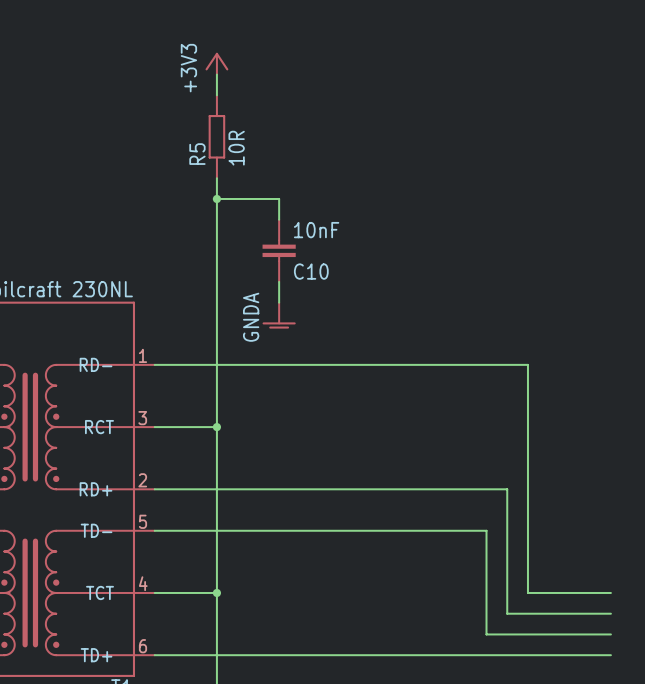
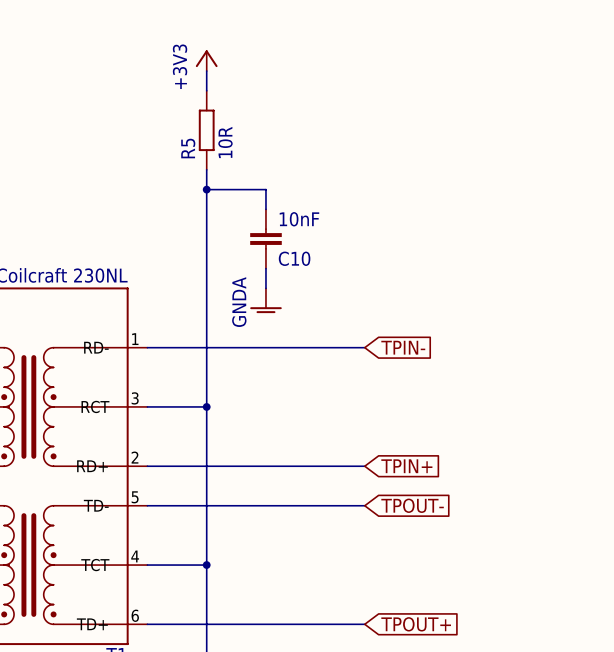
wire: (382, 364) (527, 364) (527, 592) (610, 592) -> none
global label: none -> TPIN- (403, 347)
wire: (382, 489) (507, 489) (507, 613) (610, 613) -> none
global label: none -> TPIN+ (406, 466)
wire: (382, 530) (486, 530) (486, 634) (610, 634) -> none
global label: none -> TPOUT- (412, 505)
wire: (382, 655) (610, 655) -> none
global label: none -> TPOUT+ (416, 624)

